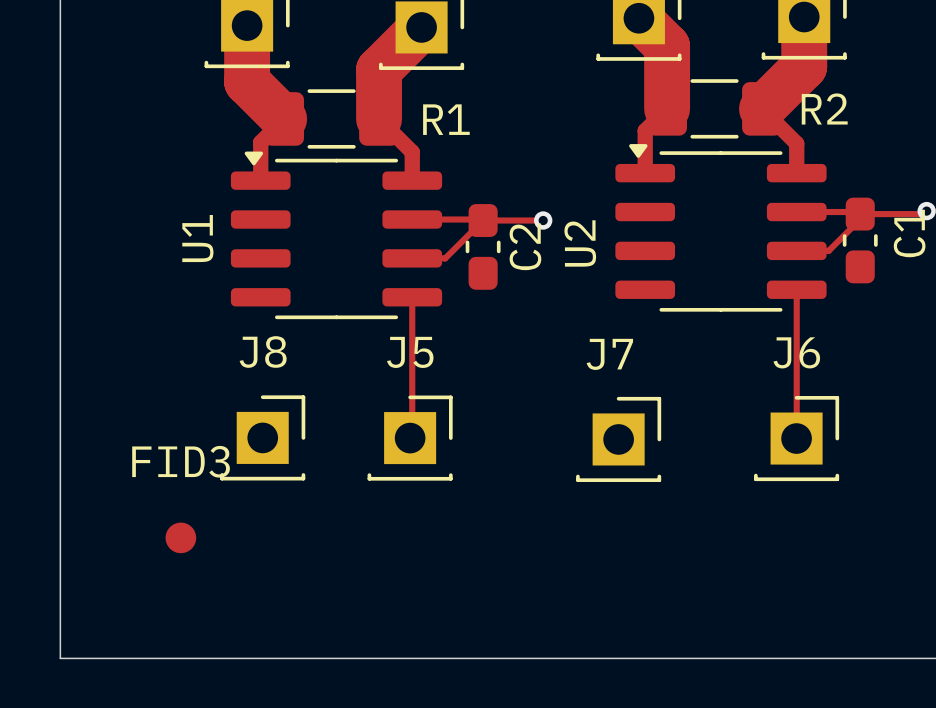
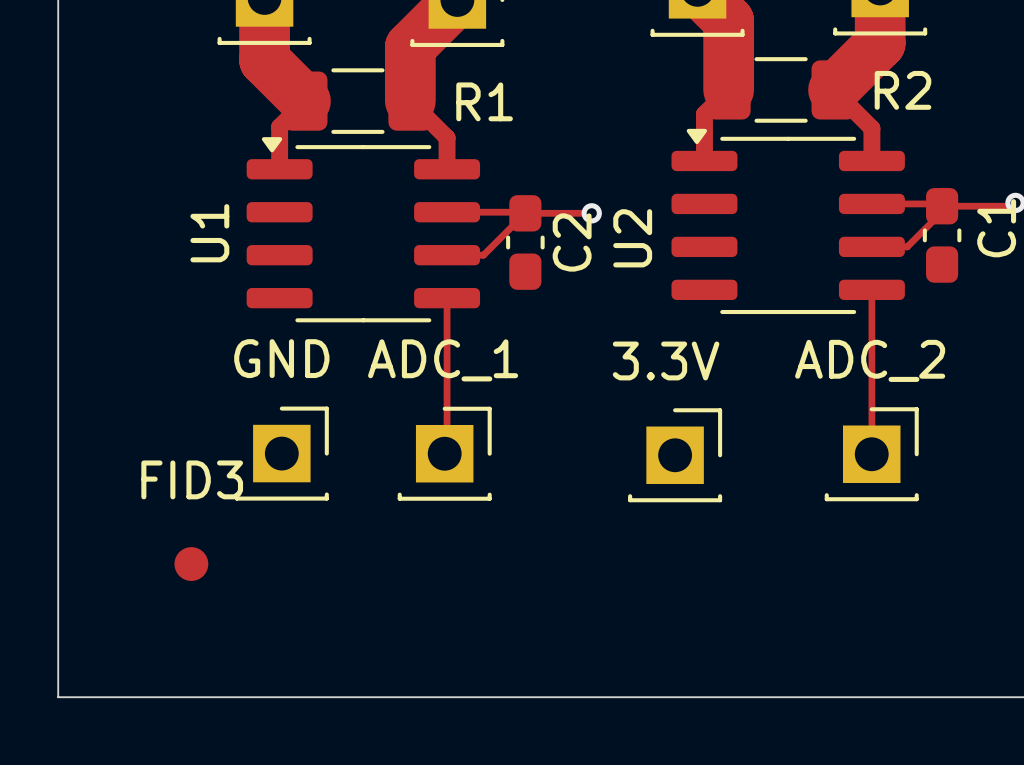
J8 name: J8 (263, 351) -> GND (281, 358)
J5 name: J5 (410, 352) -> ADC_1 (443, 360)
J6 name: J6 (796, 352) -> ADC_2 (870, 360)
J7 name: J7 (609, 354) -> 3.3V (666, 360)

